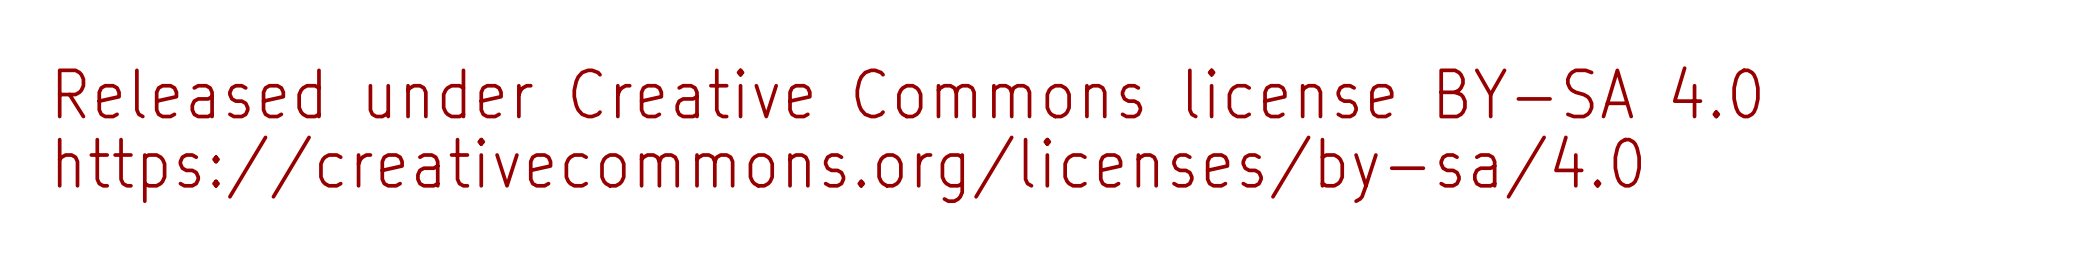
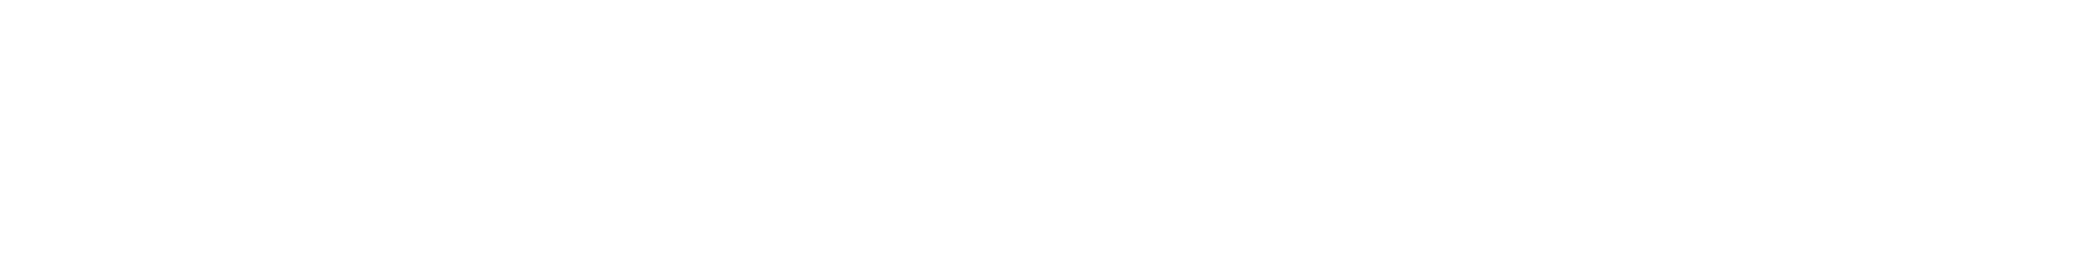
text: Released under Creative Commons license BY-SA 4.0 (908, 92) -> none
text: https://creativecommons.org/licenses/by-sa/4.0 (849, 169) -> none

